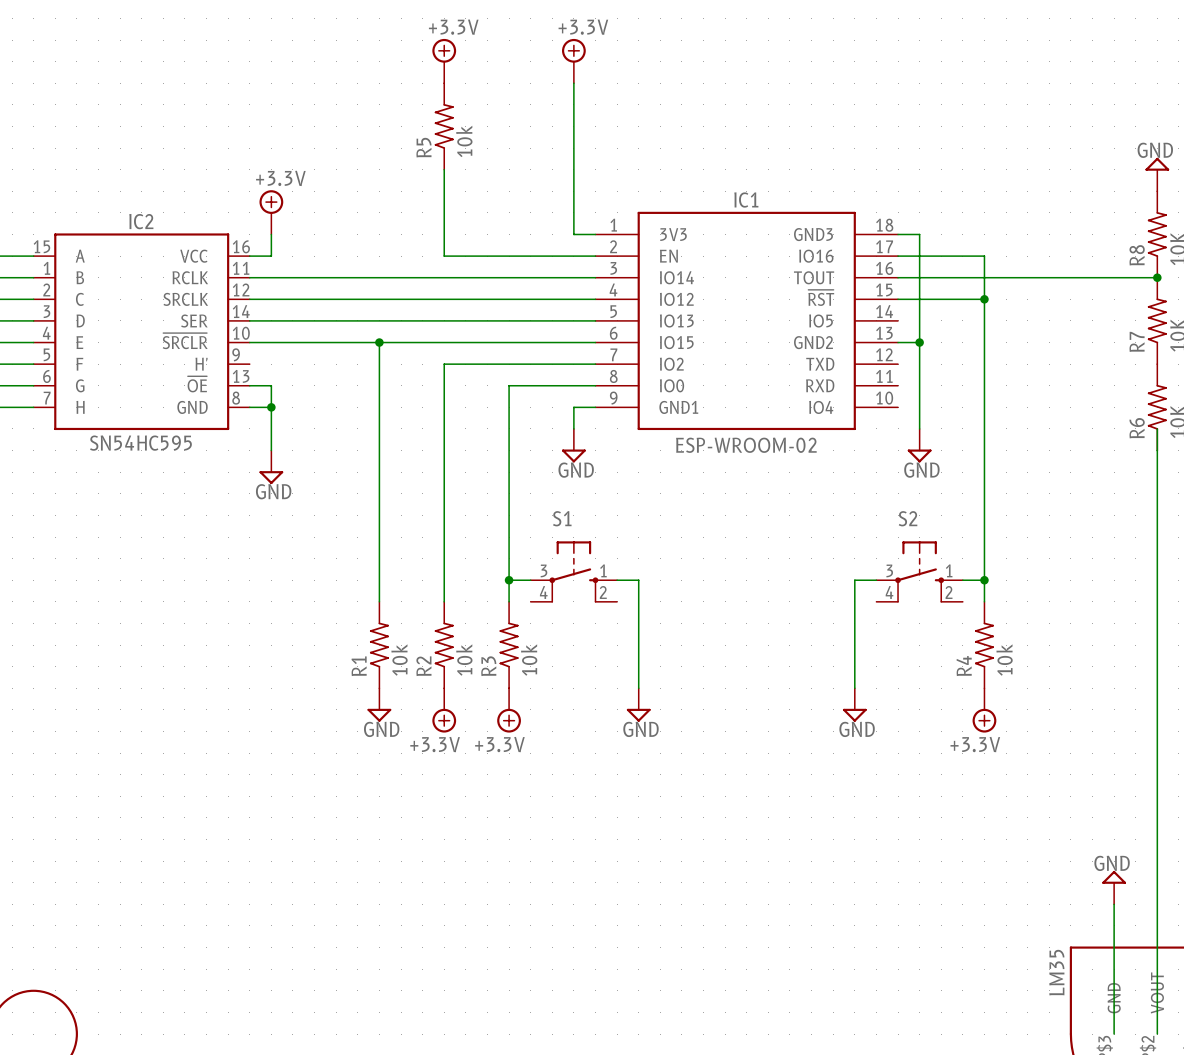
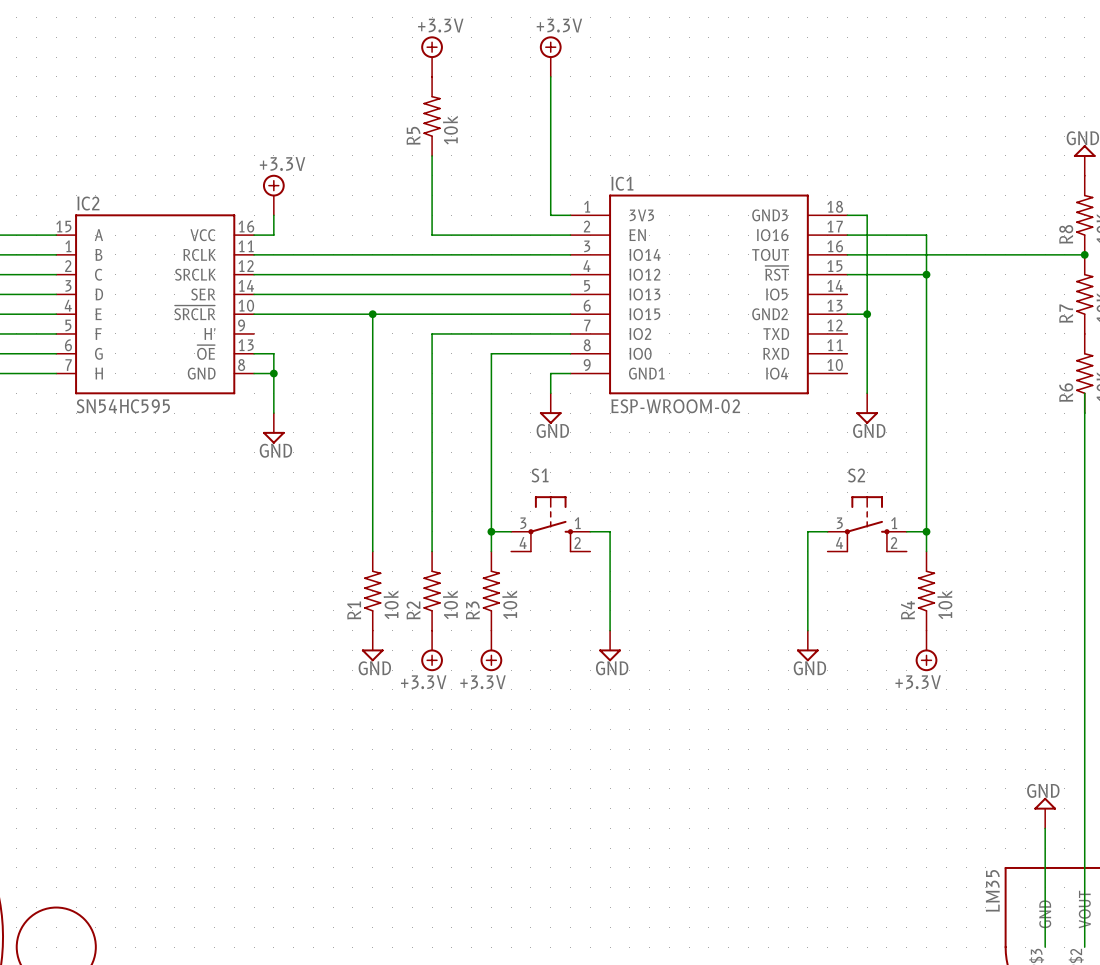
IC1 name position: IC1 (746, 200) -> IC1 (622, 183)
IC2 name position: IC2 (141, 221) -> IC2 (88, 203)
IC2 value position: SN54HC595 (140, 443) -> SN54HC595 (123, 406)
IC1 value position: ESP-WROOM-02 (746, 445) -> ESP-WROOM-02 (675, 406)

